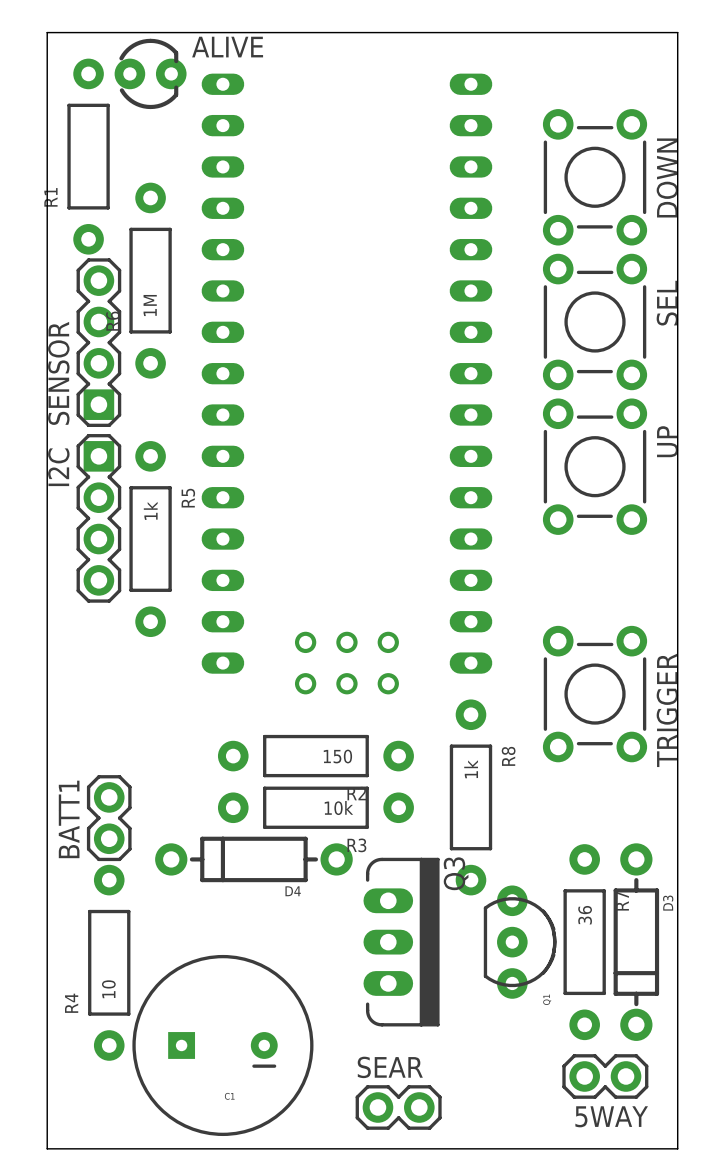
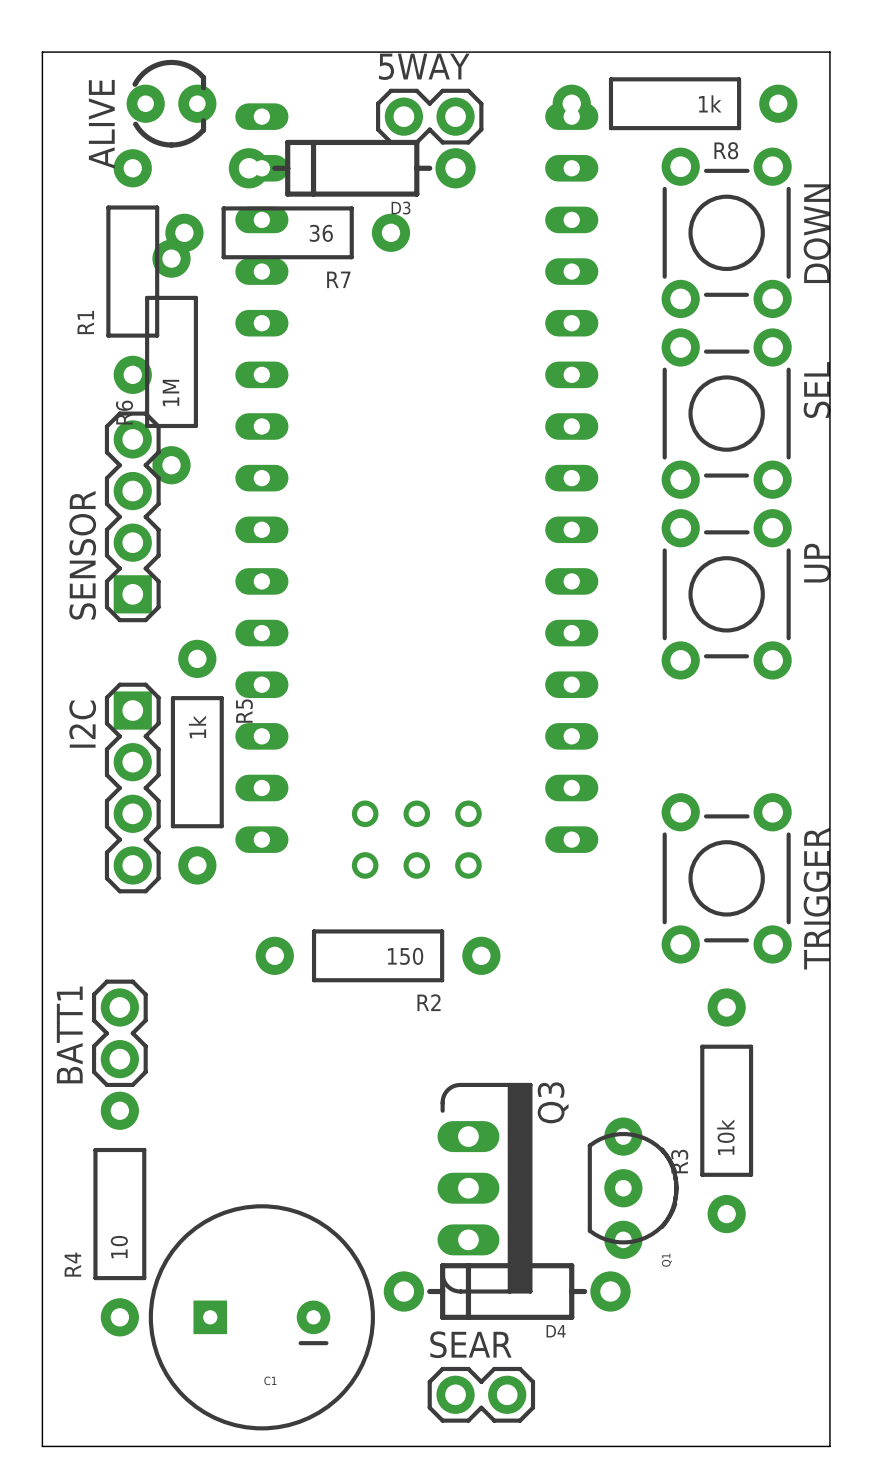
ALIVE name rotation: 0° (227, 47) -> 90° counterclockwise (101, 124)
ALIVE name position: ALIVE (227, 47) -> ALIVE (101, 124)
R1 position: (88, 156) -> (132, 271)
SENSOR position: (98, 342) -> (132, 516)
I2C position: (98, 518) -> (132, 787)
R5 position: (150, 539) -> (197, 762)
R8 rotation: 0° (470, 797) -> 90° clockwise (675, 103)
R8 position: (470, 797) -> (675, 103)
R3 rotation: 0° (315, 807) -> 90° clockwise (726, 1110)
R3 position: (315, 807) -> (726, 1110)
D4 position: (253, 859) -> (507, 1291)
R7 rotation: 0° (584, 942) -> 90° clockwise (287, 232)
R7 position: (584, 942) -> (287, 232)
D3 rotation: 0° (636, 942) -> 90° clockwise (352, 168)
D3 position: (636, 942) -> (352, 168)
5WAY position: (605, 1076) -> (429, 116)
5WAY name position: 5WAY (611, 1116) -> 5WAY (424, 66)

